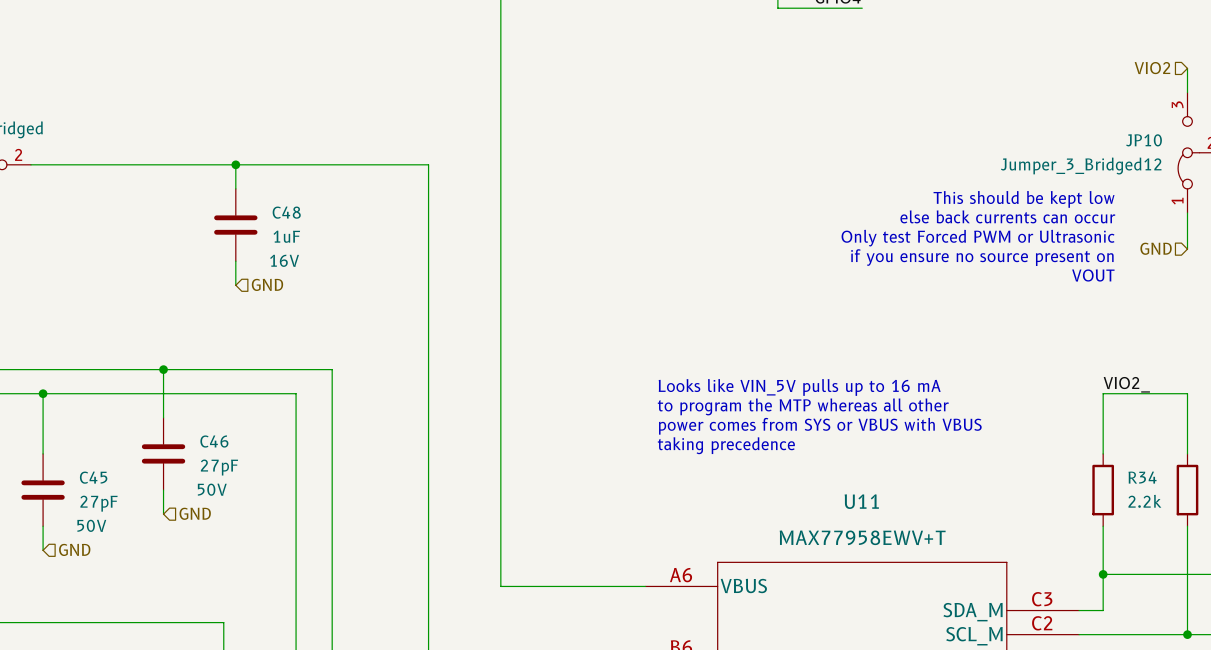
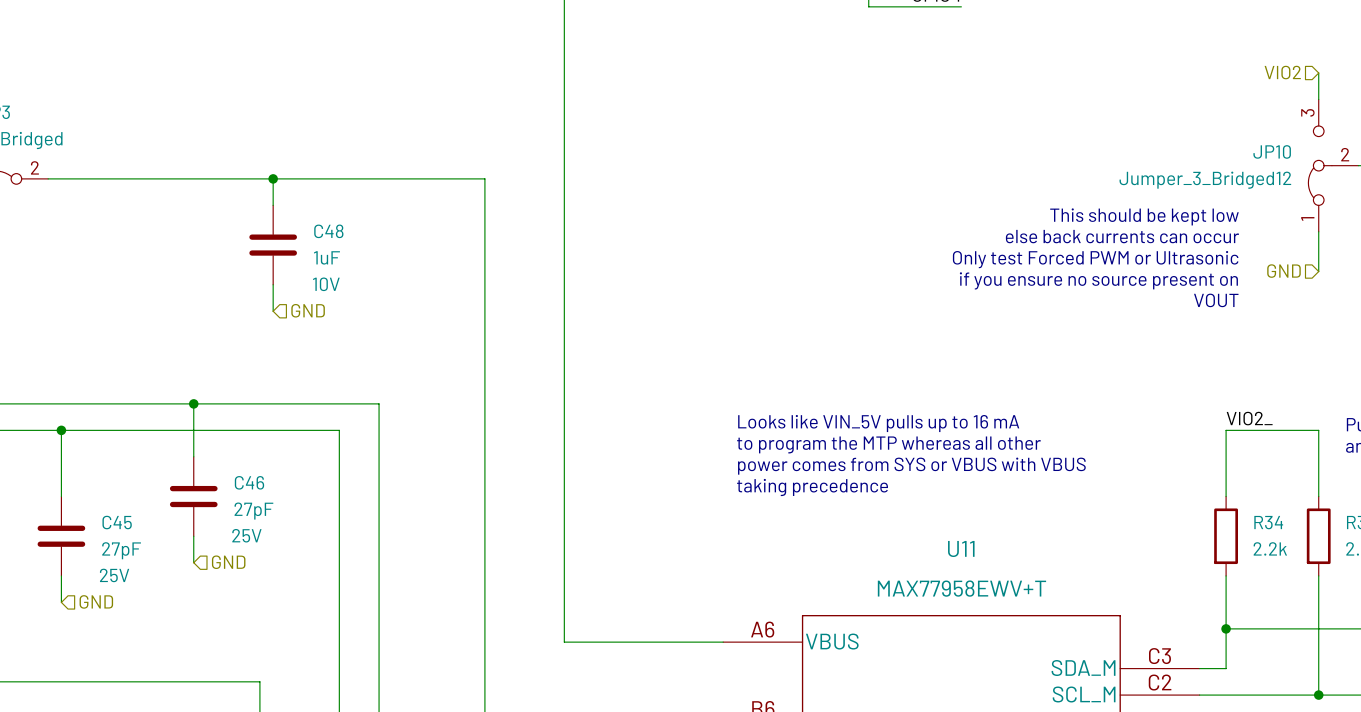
C48 text: 16V (284, 260) -> 10V (326, 284)
C46 text: 50V (212, 489) -> 25V (246, 535)
C45 text: 50V (91, 525) -> 25V (114, 575)

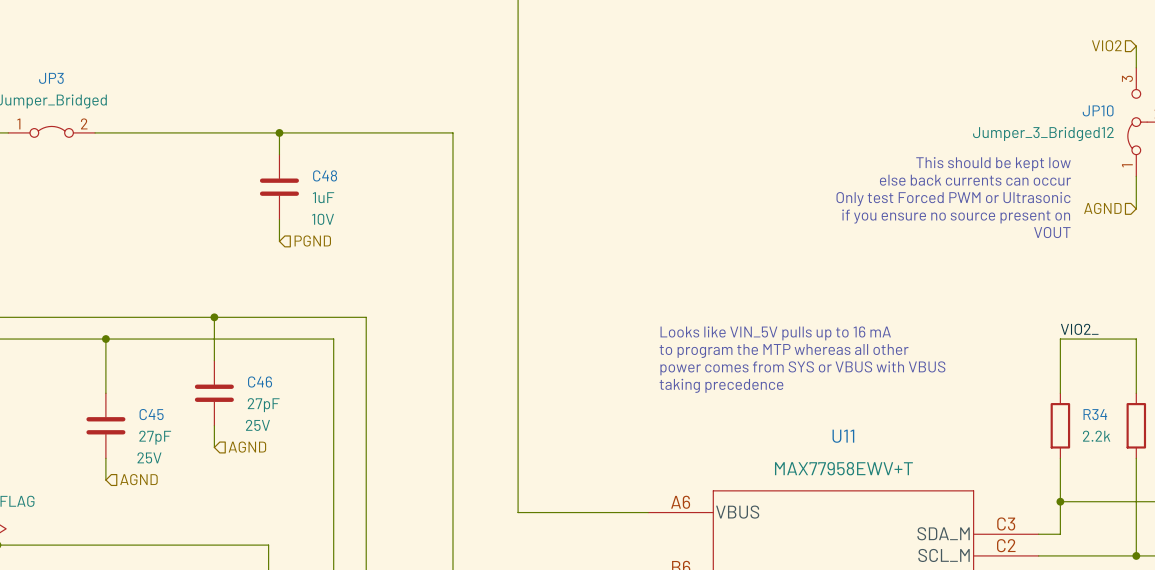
hierarchical label: GND (1283, 271) -> AGND (1102, 208)
hierarchical label: GND (308, 310) -> PGND (312, 241)
hierarchical label: GND (228, 562) -> AGND (247, 447)
hierarchical label: GND (96, 601) -> AGND (138, 479)

